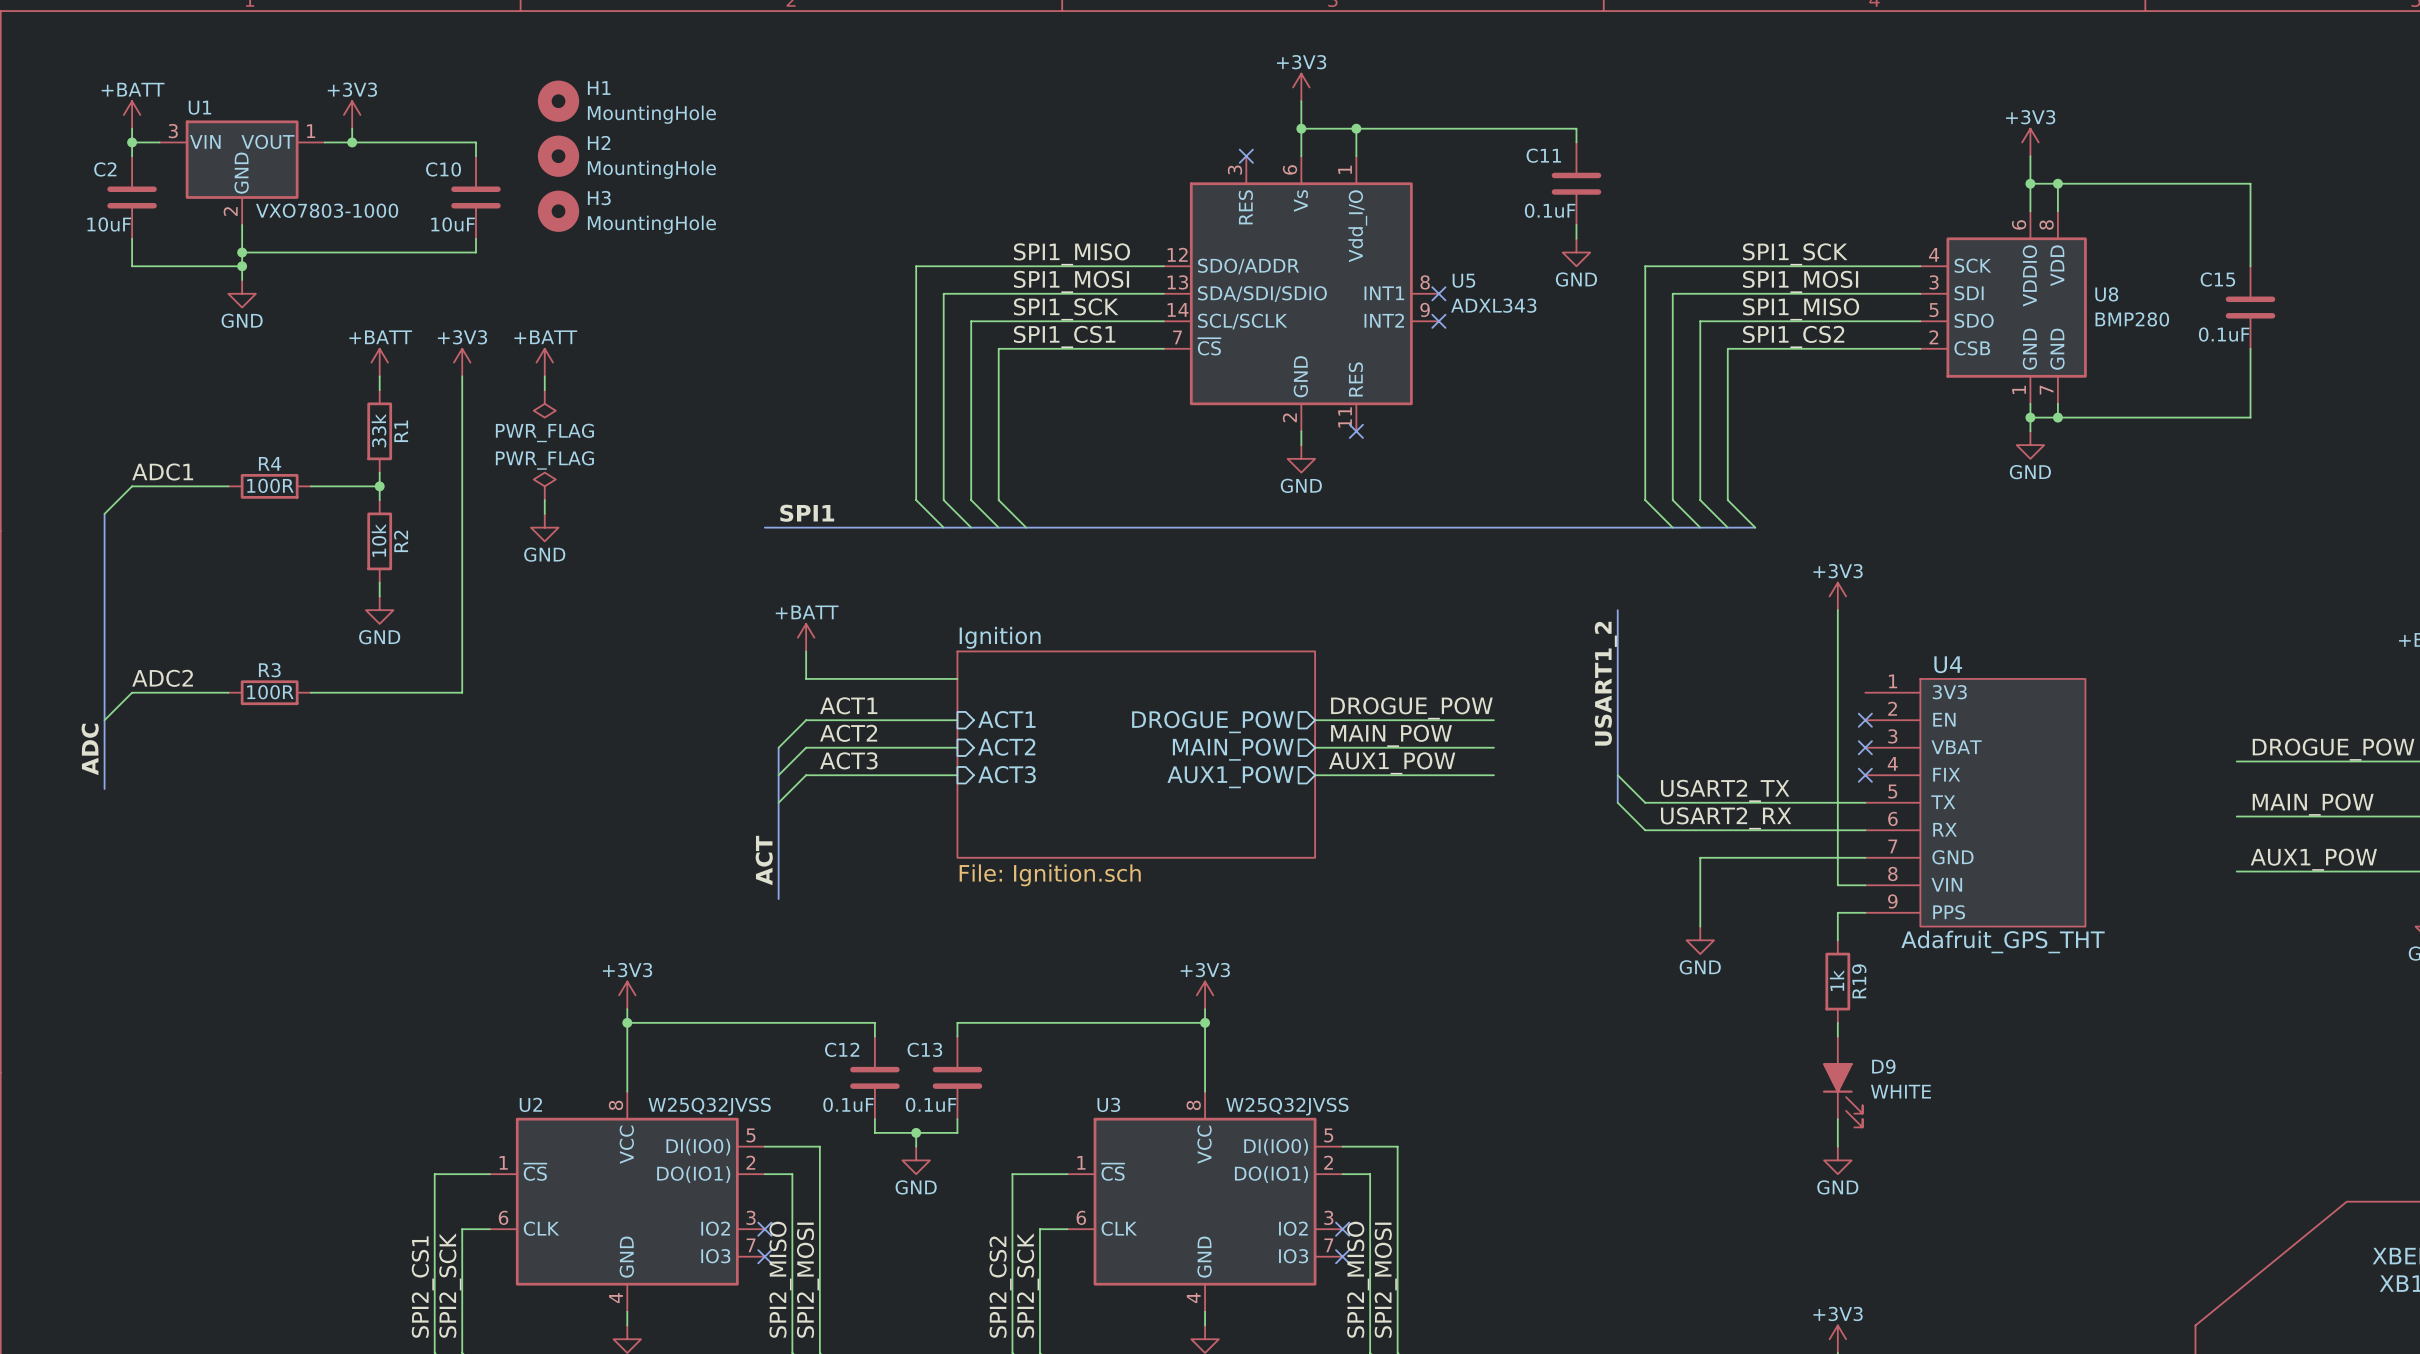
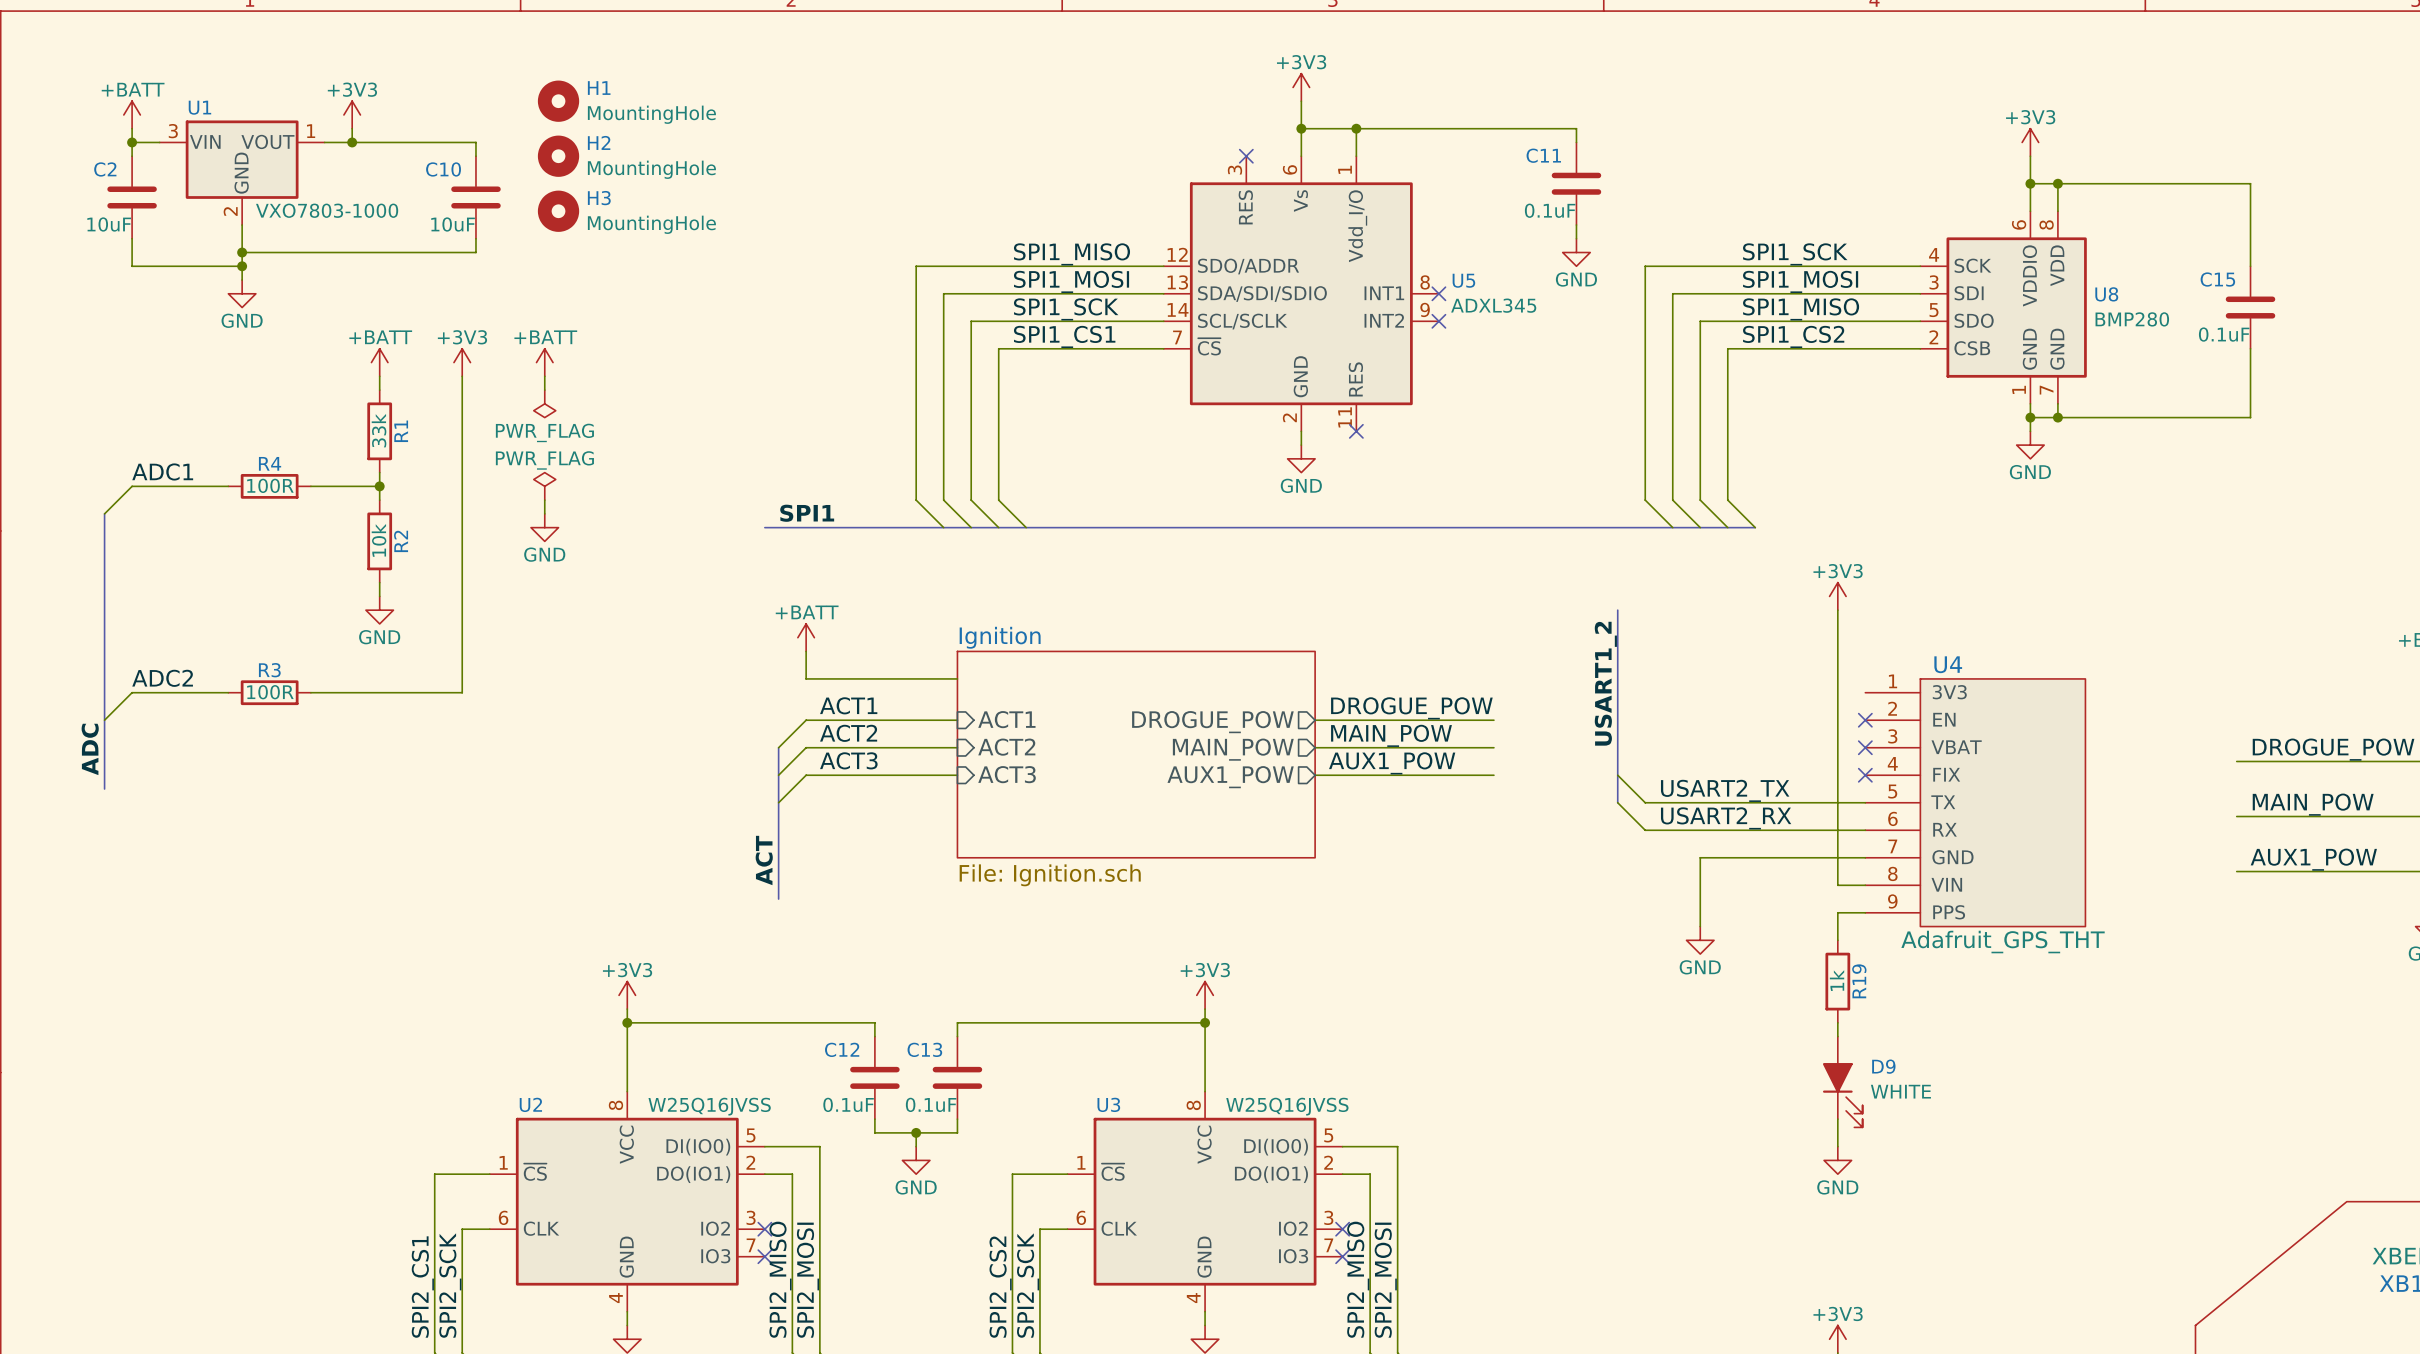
U5 value: ADXL343 (1493, 305) -> ADXL345 (1493, 305)
U2 value: W25Q32JVSS (709, 1106) -> W25Q16JVSS (709, 1106)
U3 value: W25Q32JVSS (1287, 1106) -> W25Q16JVSS (1287, 1106)

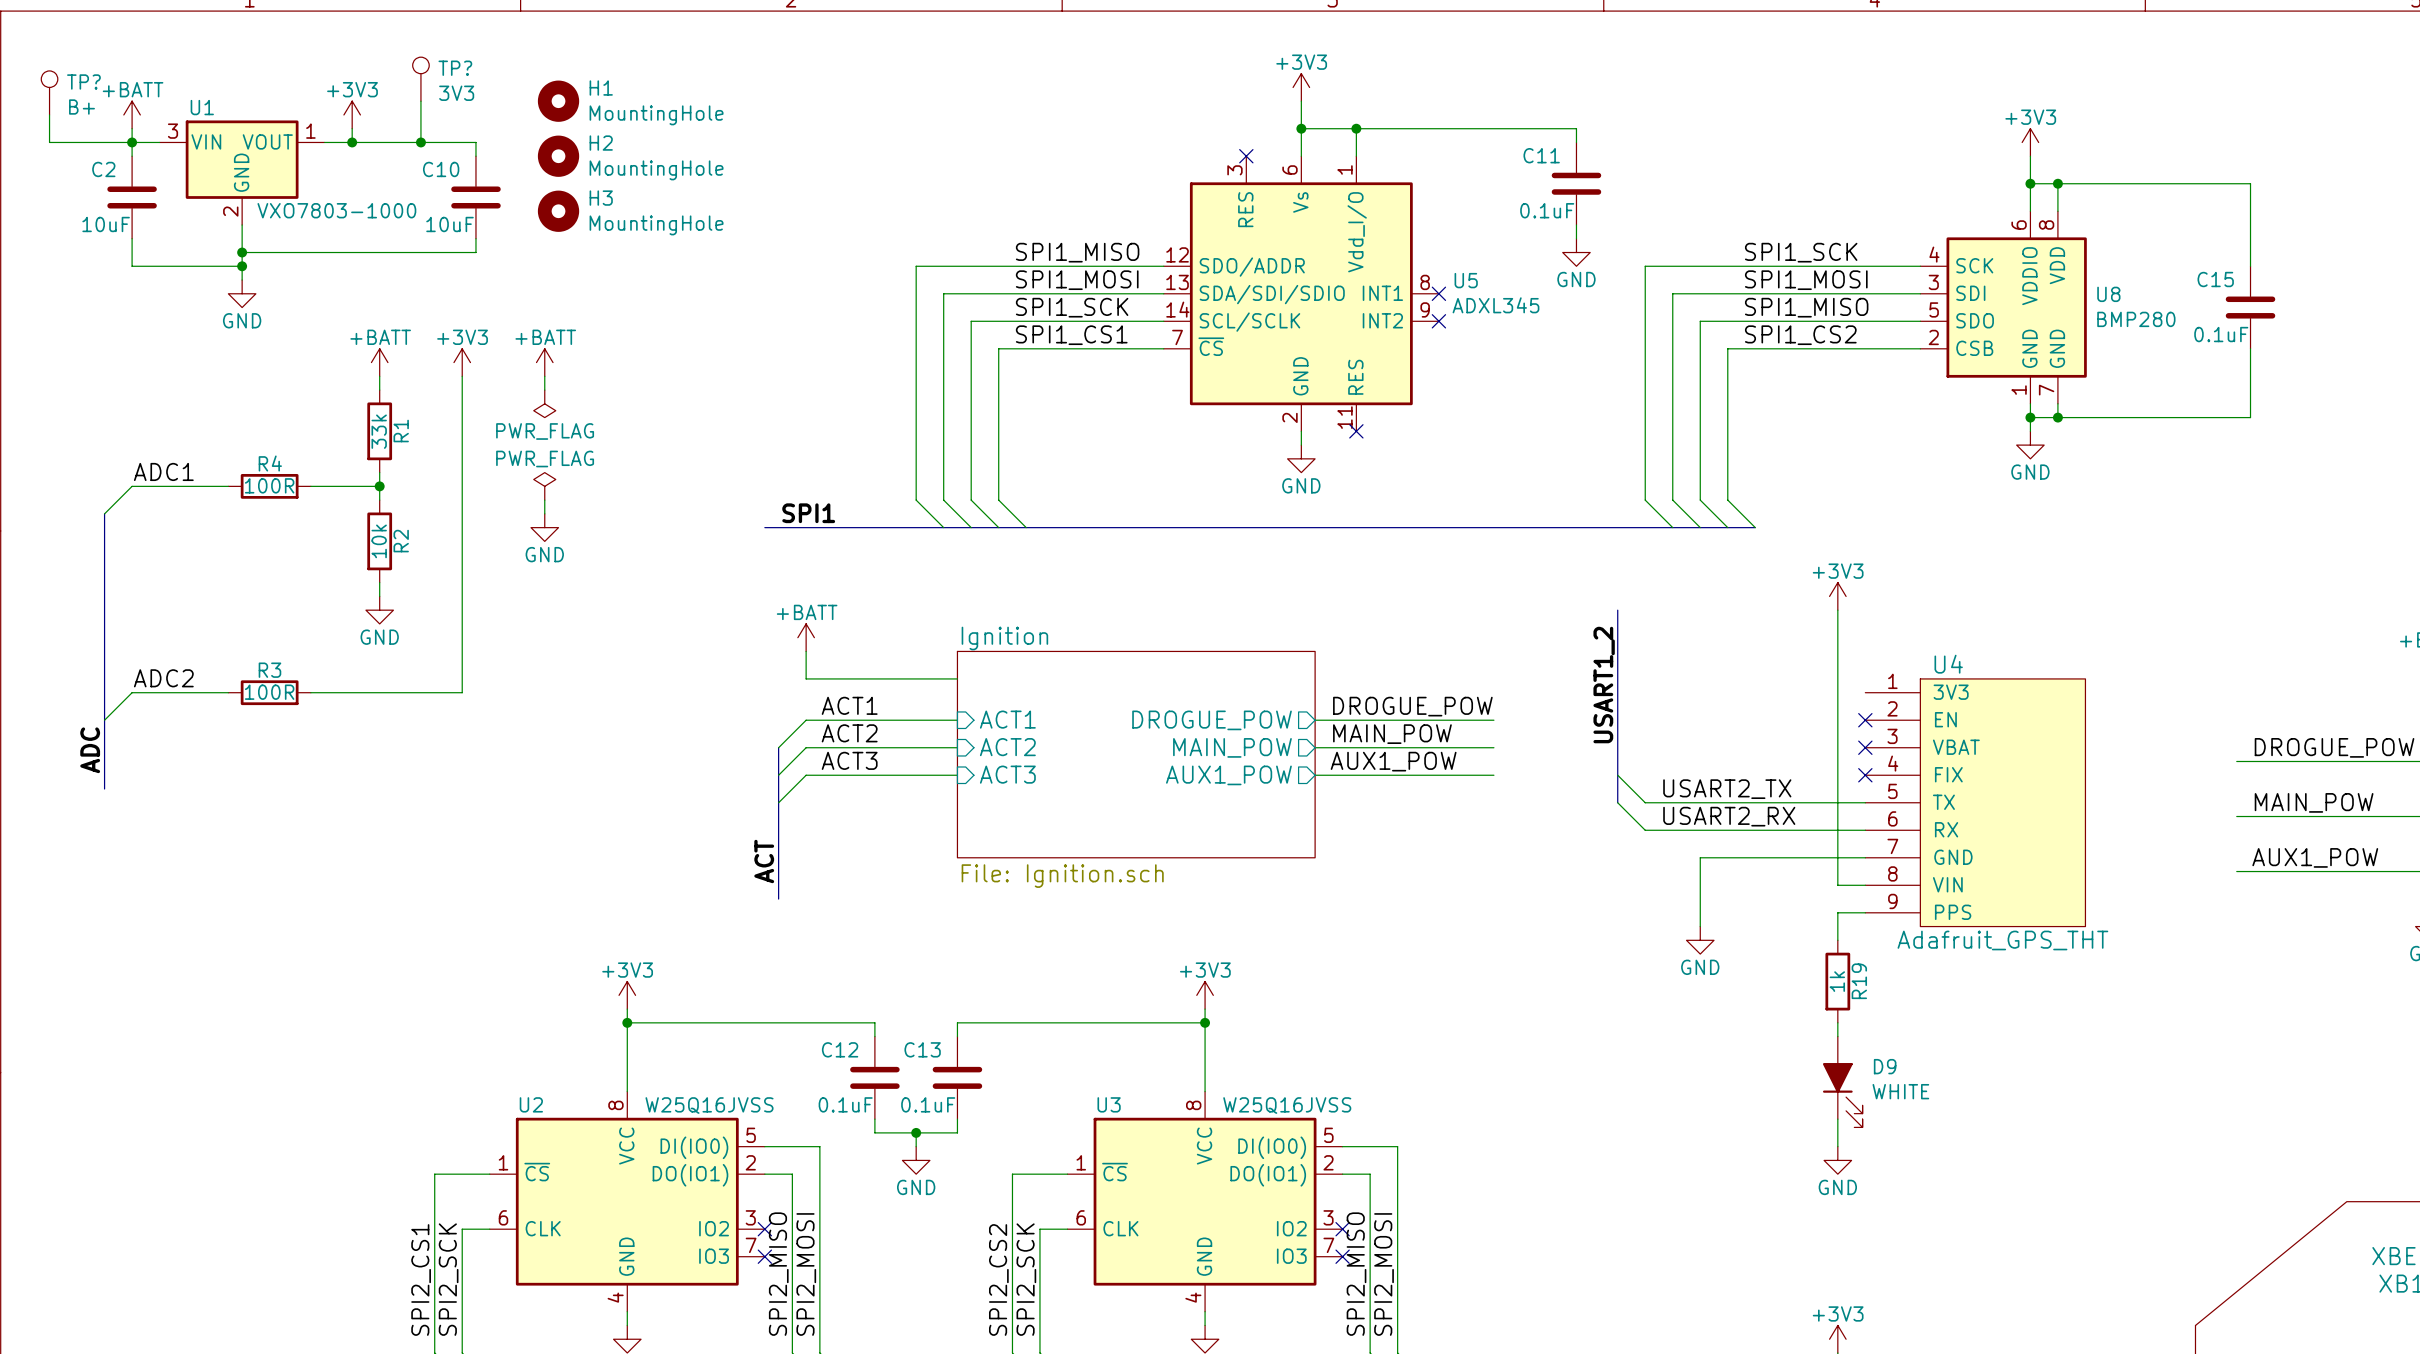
TP?: none -> 3V3 (420, 79)
TP?: none -> B+ (49, 92)
wire: none -> (420, 101) (420, 142)
wire: none -> (49, 114) (49, 142) (132, 142)
junction: none -> (420, 142)

